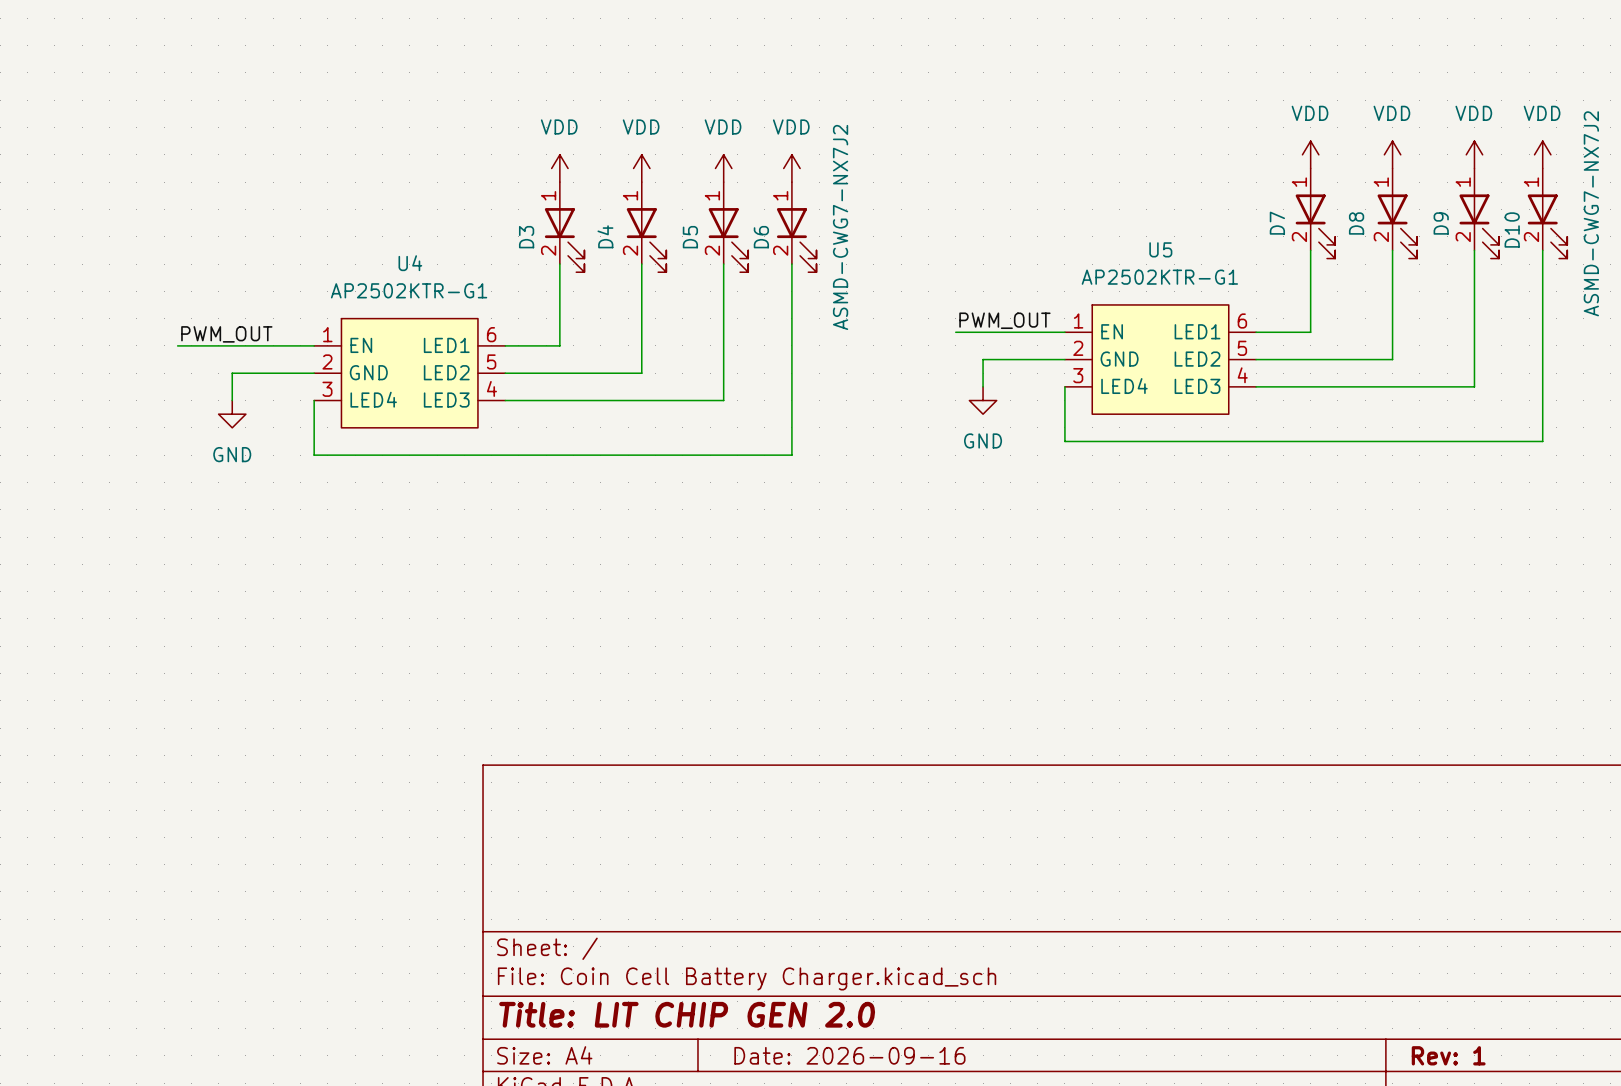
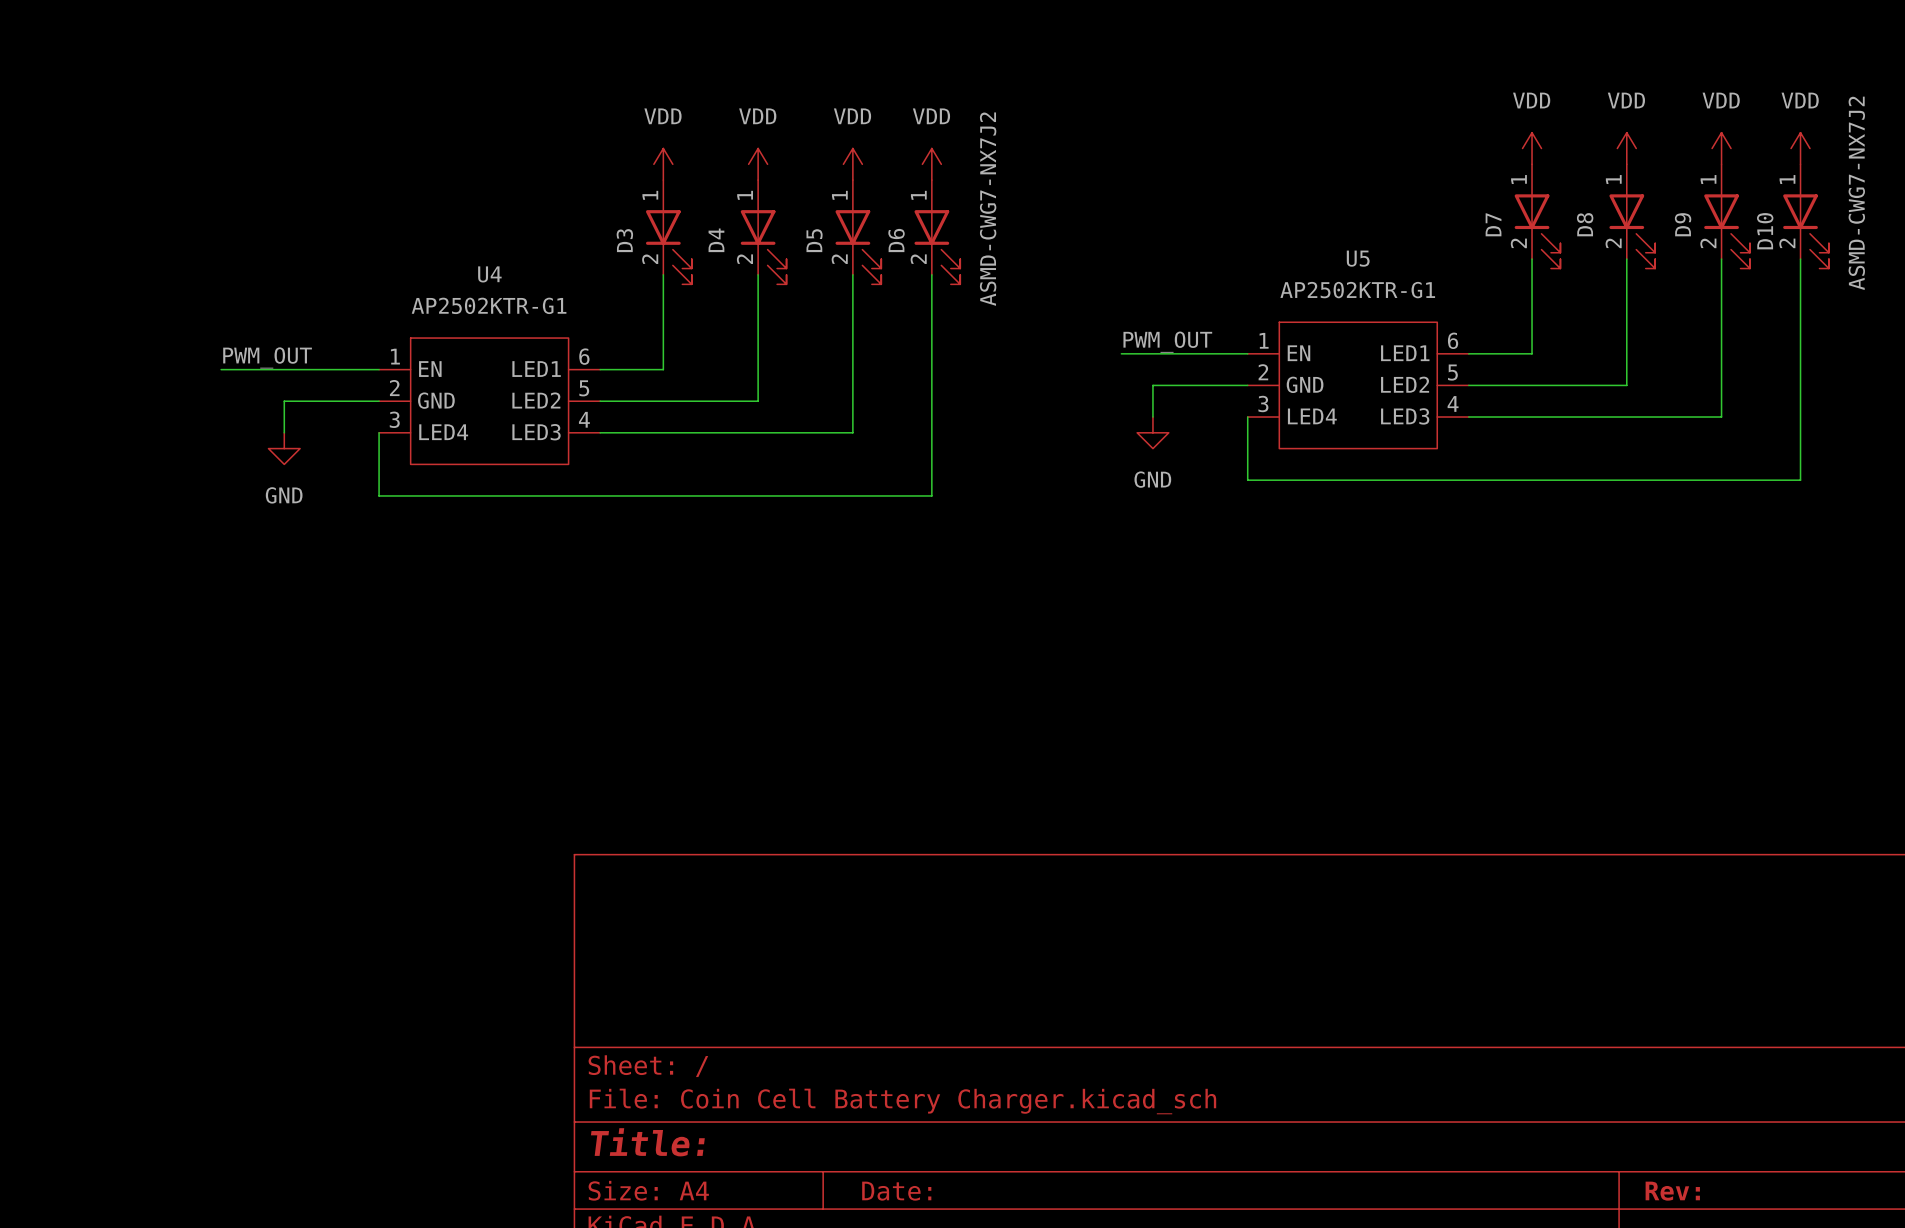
title block: Title: LIT CHIP GEN 2.0 (687, 1014) -> Title: (647, 1142)
title block: Date: 2026-09-16 (849, 1055) -> Date: (896, 1191)
title block: Rev: 1 (1448, 1055) -> Rev: (1672, 1191)

